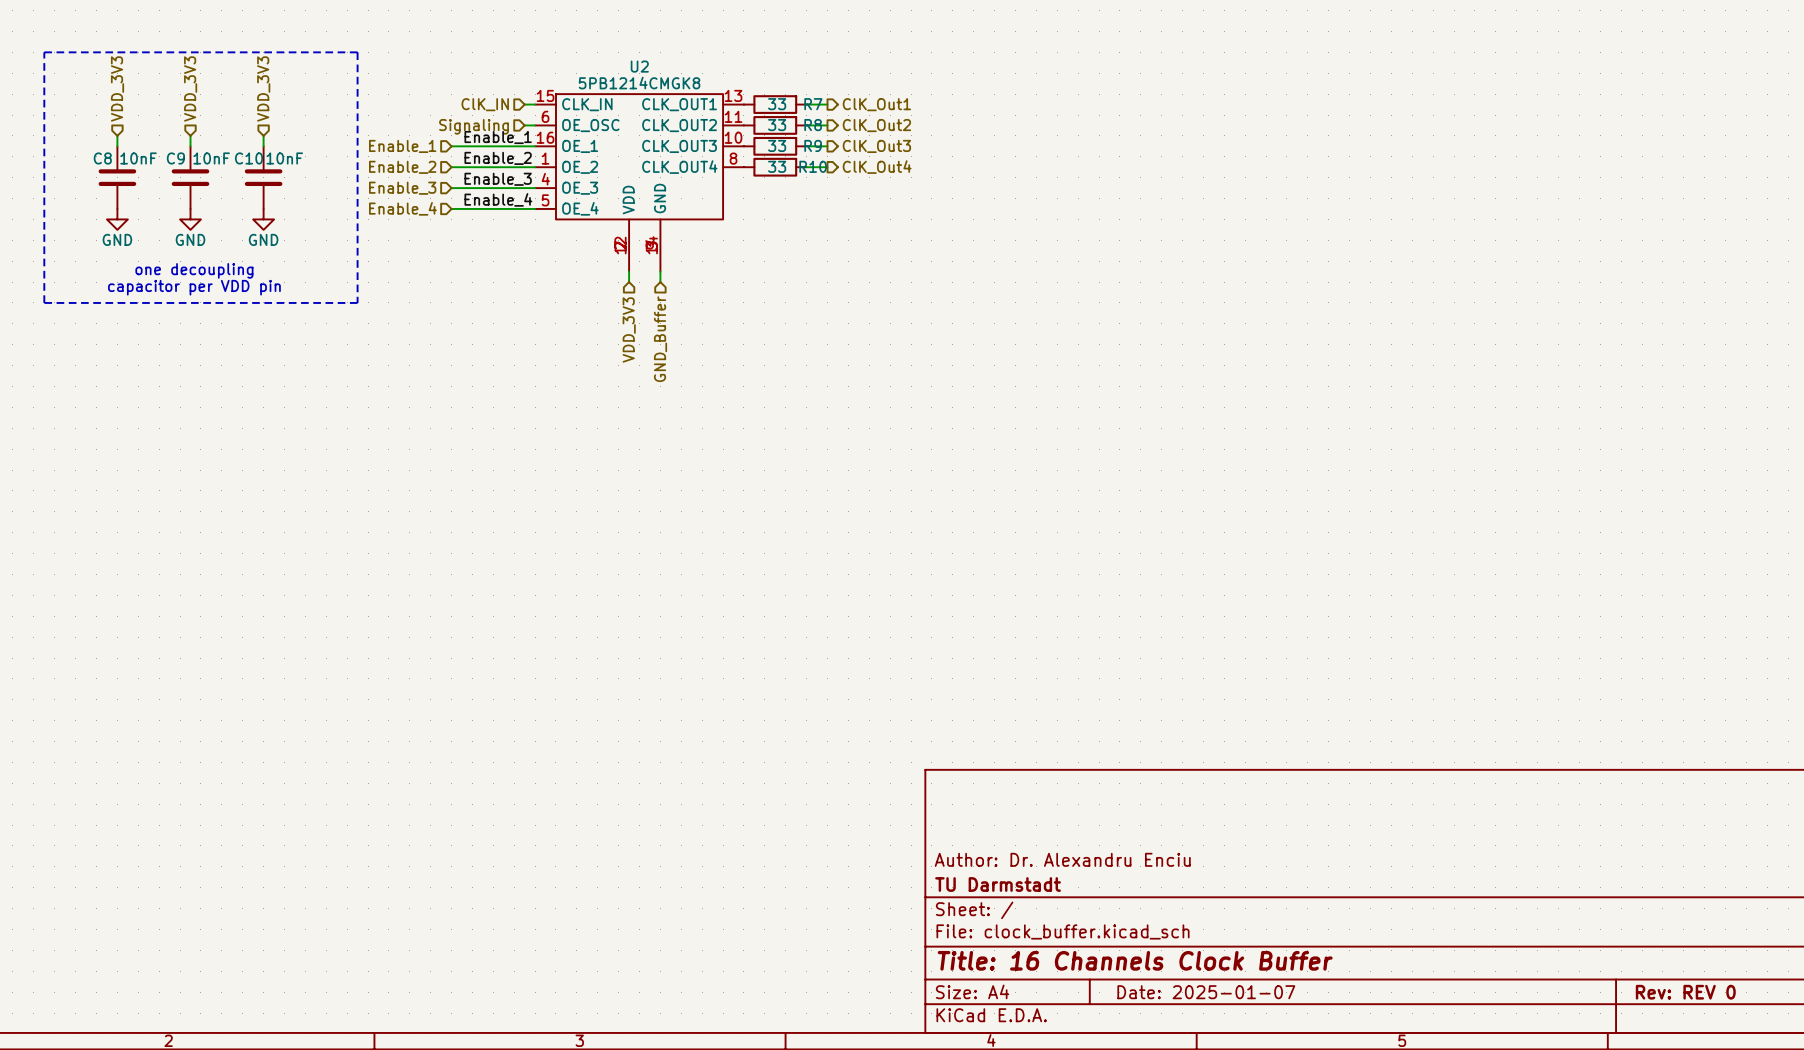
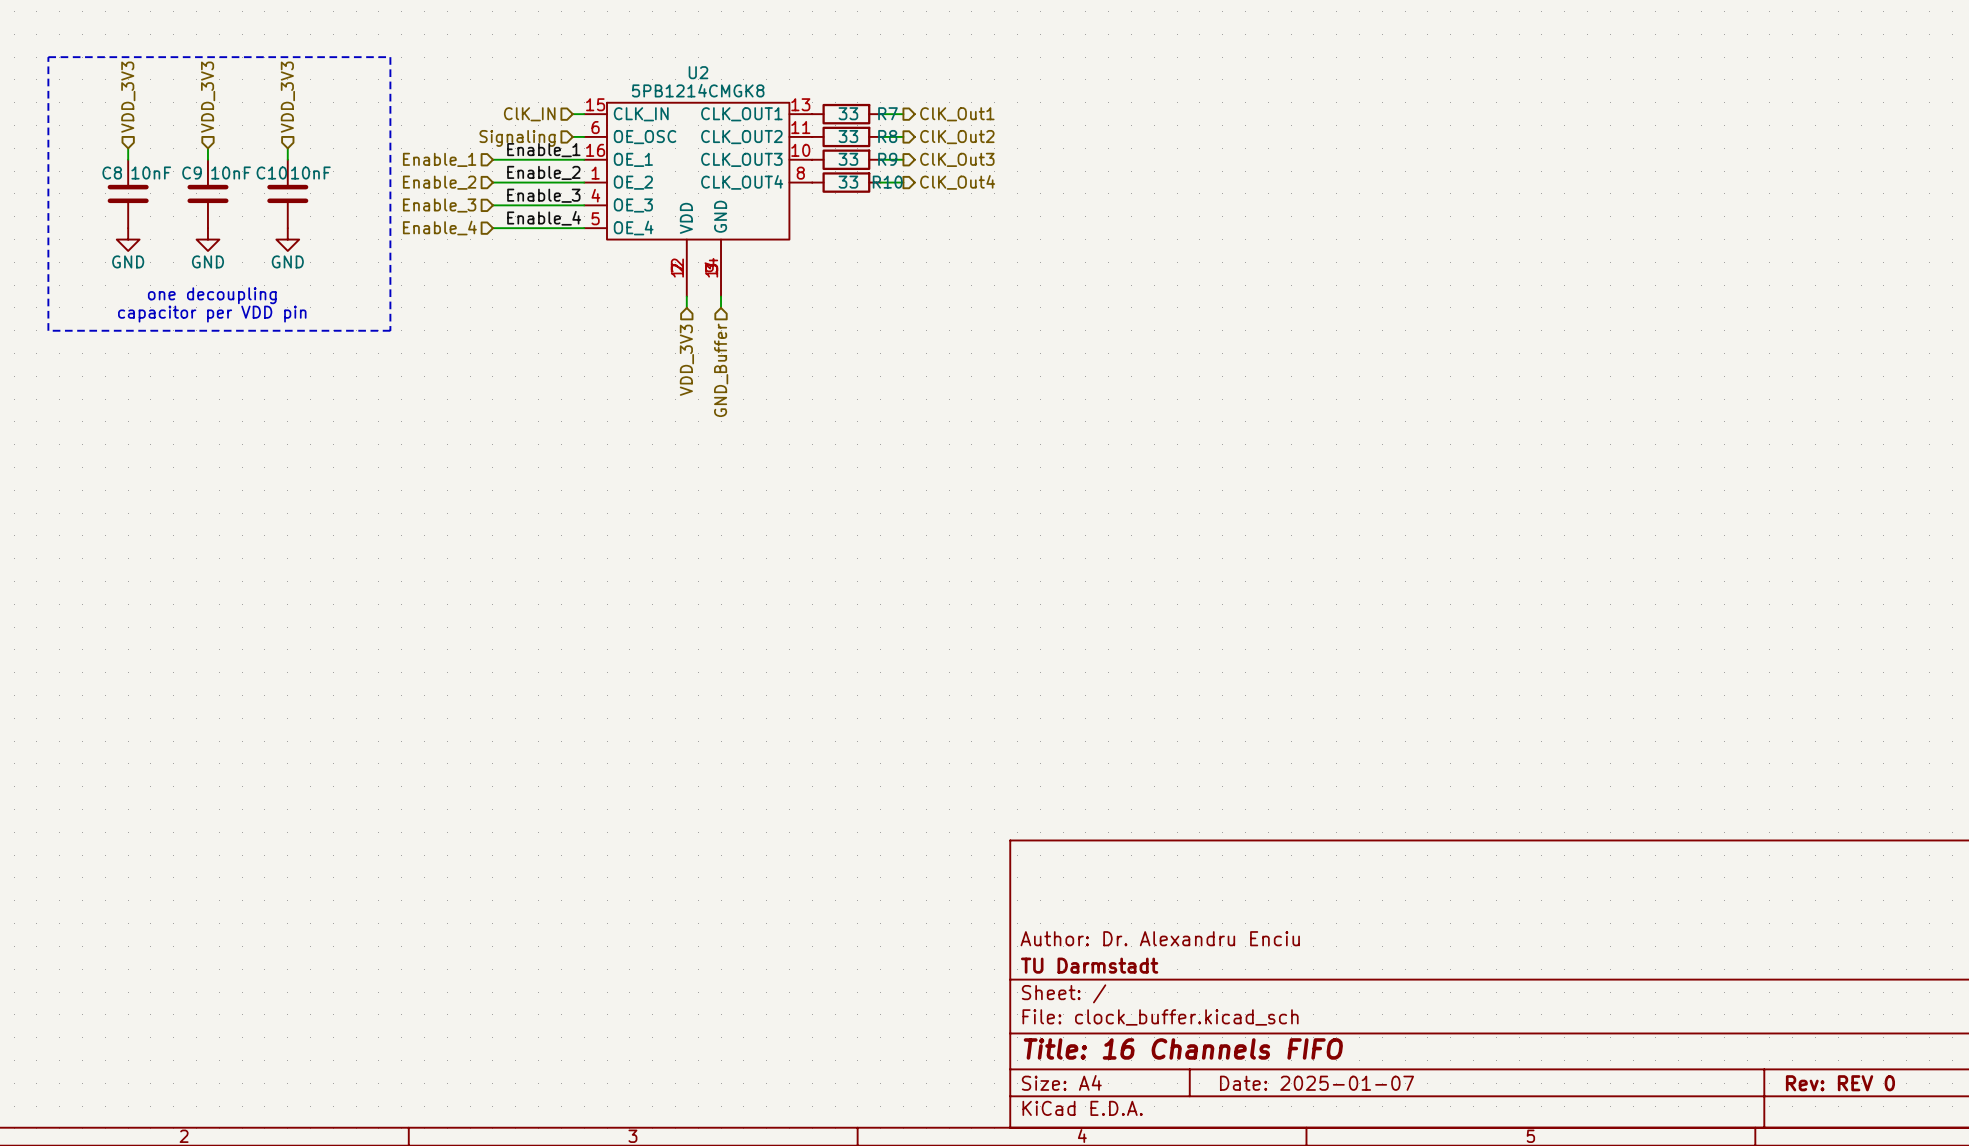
title block: Title: 16 Channels Clock Buffer (1135, 960) -> Title: 16 Channels FIFO (1183, 1048)

